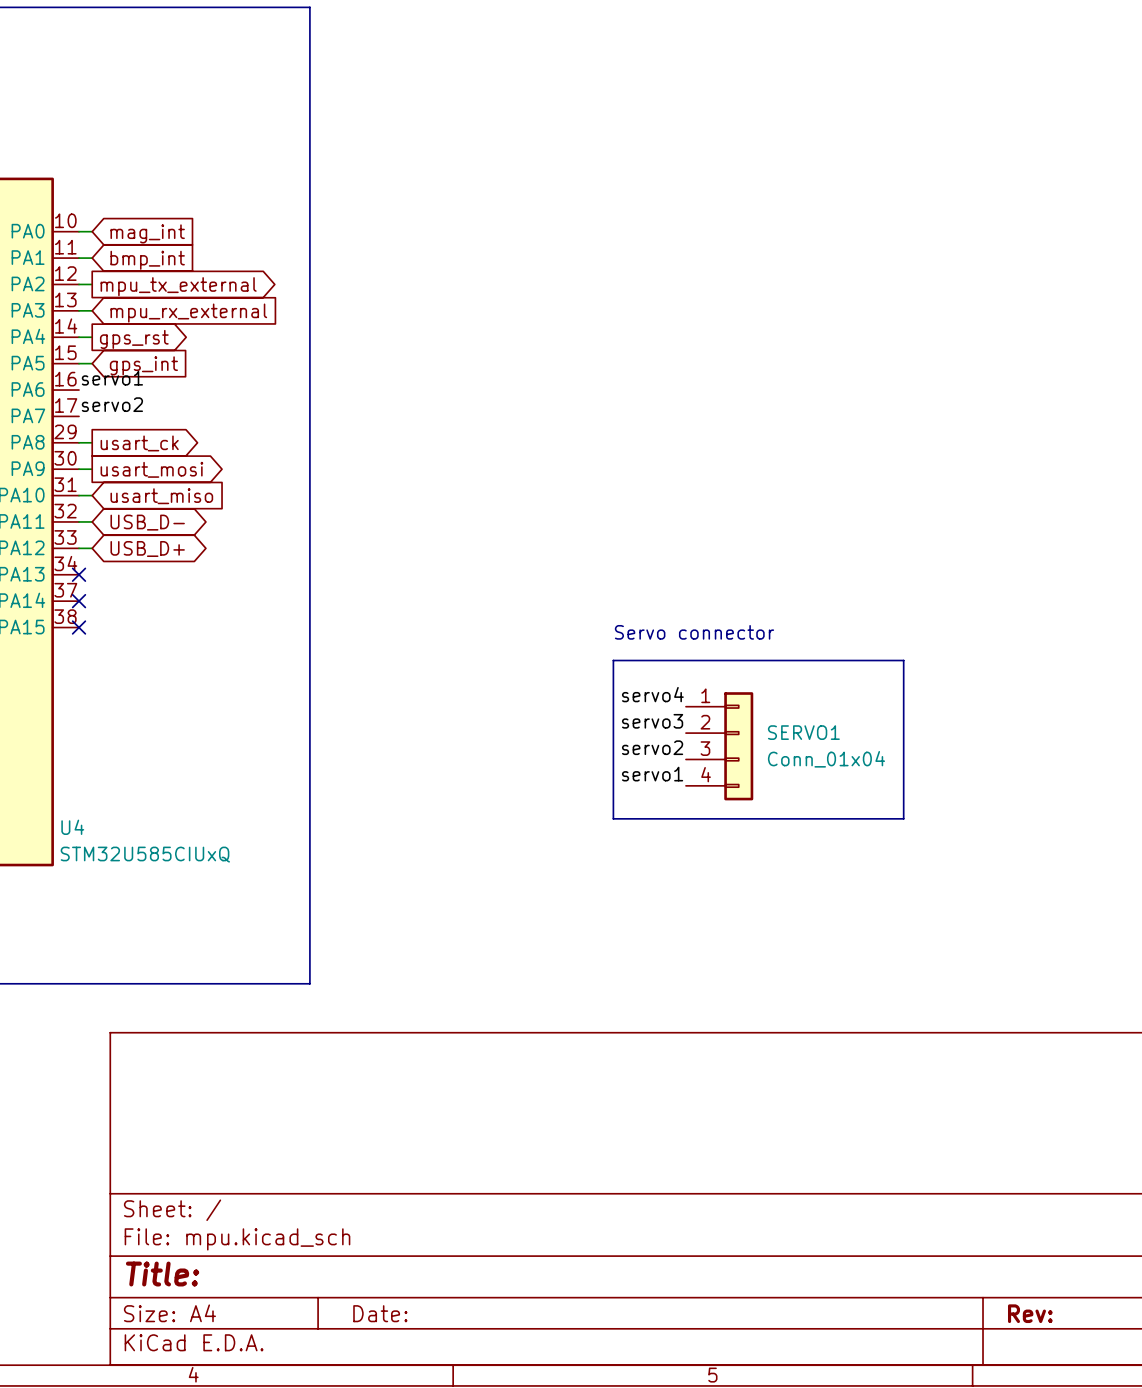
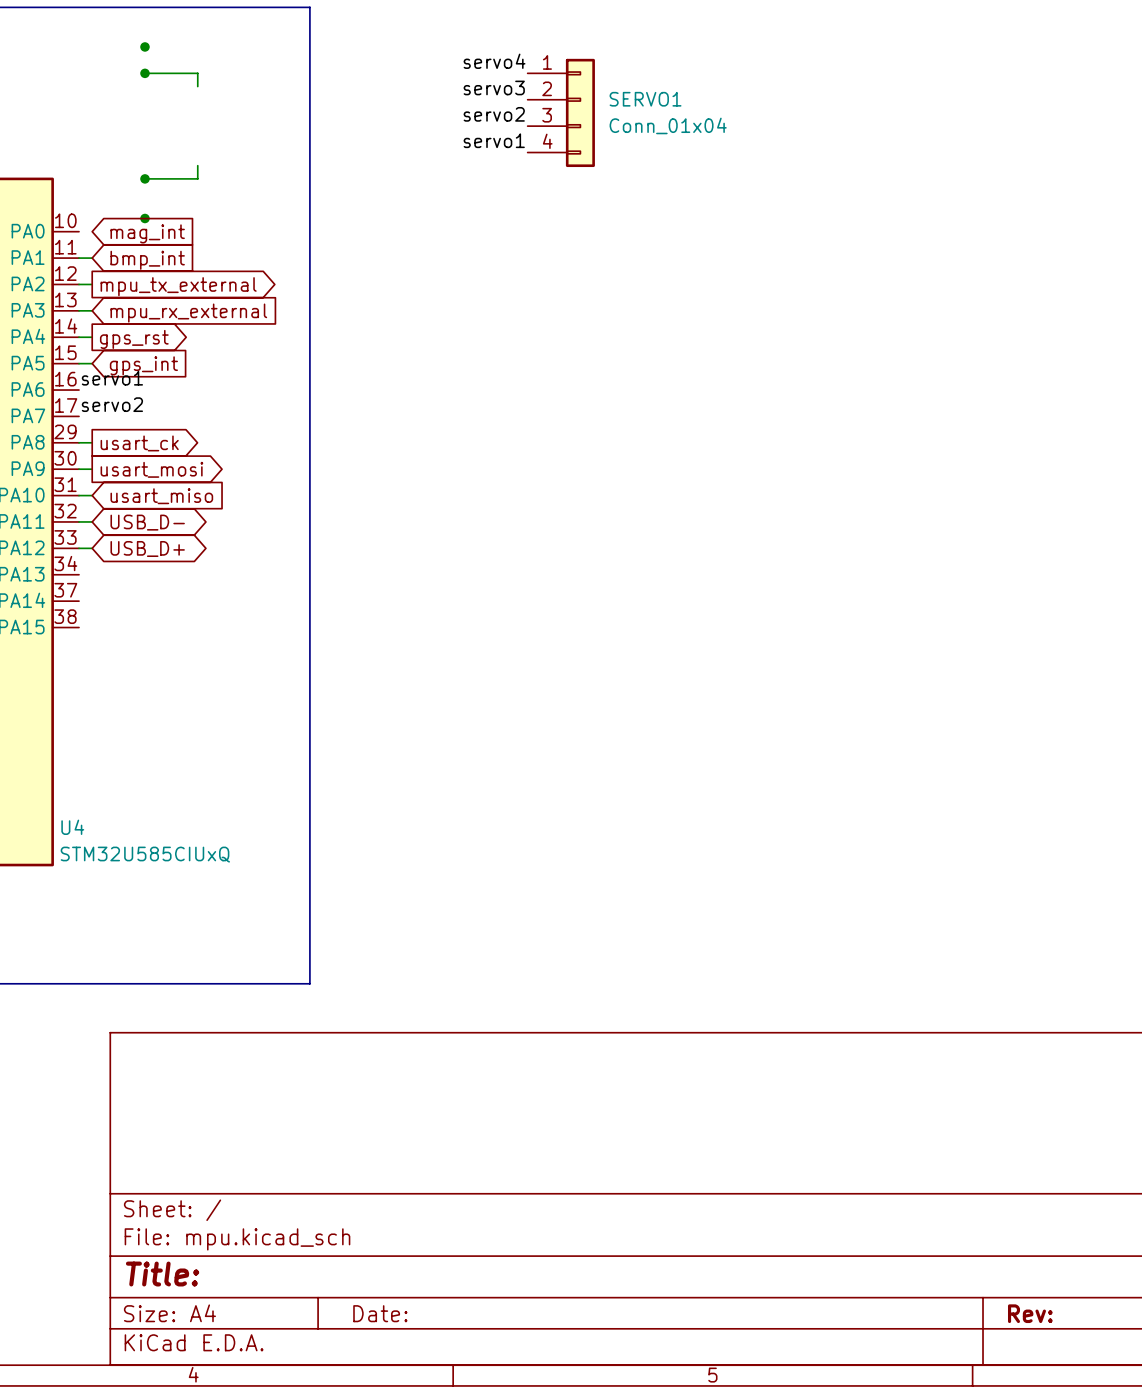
junction: none -> (144, 46)
label: none -> servo4 (494, 61)
wire: none -> (144, 73) (197, 73) (197, 86)
junction: none -> (144, 73)
label: none -> servo3 (494, 87)
label: none -> servo2 (494, 114)
label: none -> servo1 (494, 140)
wire: none -> (197, 165) (197, 178) (144, 178)
junction: none -> (144, 178)
junction: none -> (144, 218)
wire: (79, 231) (92, 231) -> none
no-connect mark: (79, 574) -> none
no-connect mark: (79, 601) -> none
no-connect mark: (79, 627) -> none
text: Servo connector (694, 632) -> none
line: (613, 660) (903, 660) (903, 818) (613, 818) (613, 660) -> none
label: servo4 (652, 694) -> none
label: servo3 (652, 721) -> none
SERVO1 position: (719, 746) -> (561, 112)
label: servo2 (652, 747) -> none
label: servo1 (652, 774) -> none

